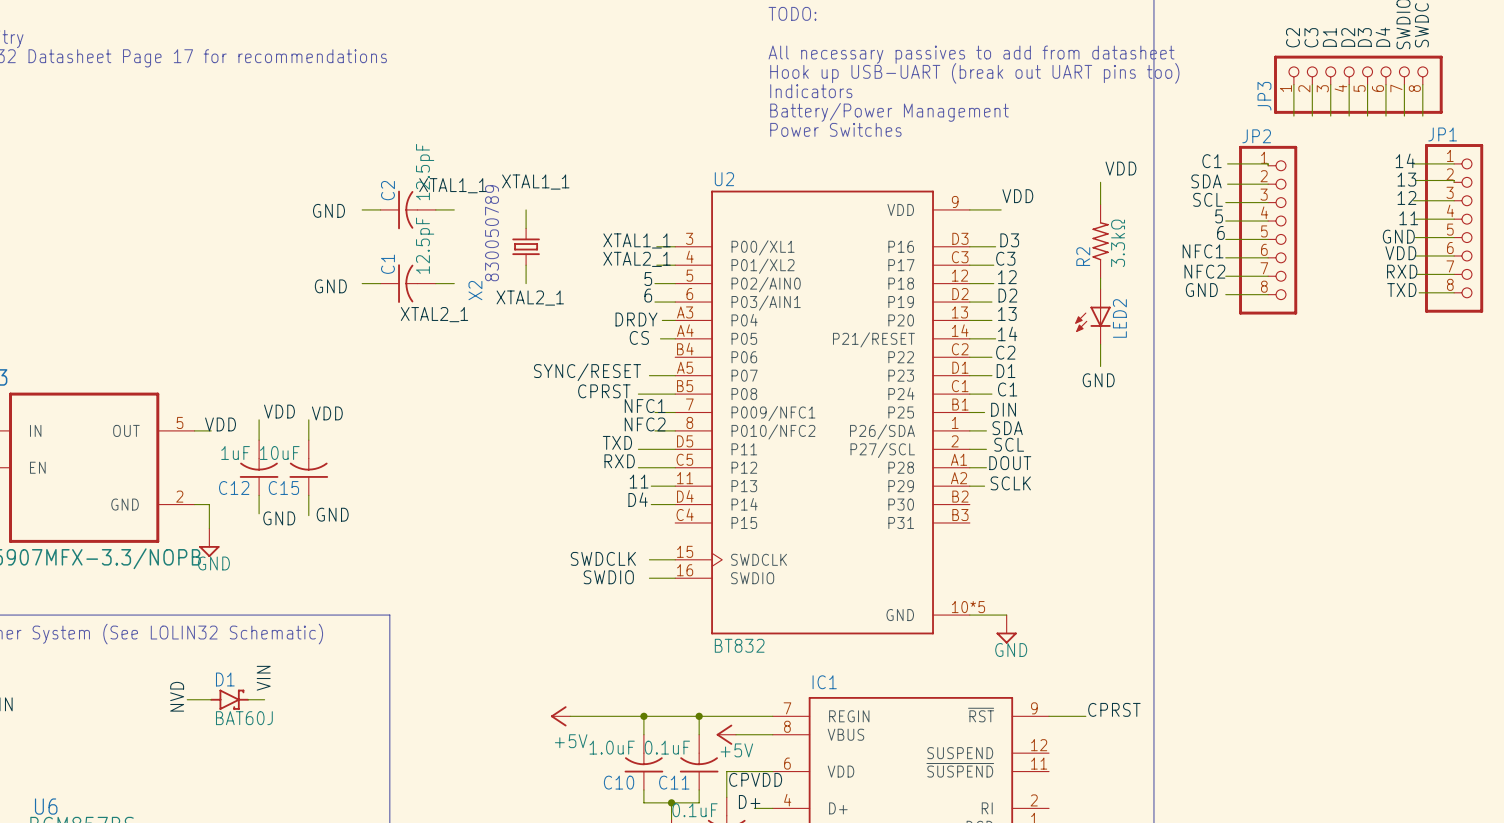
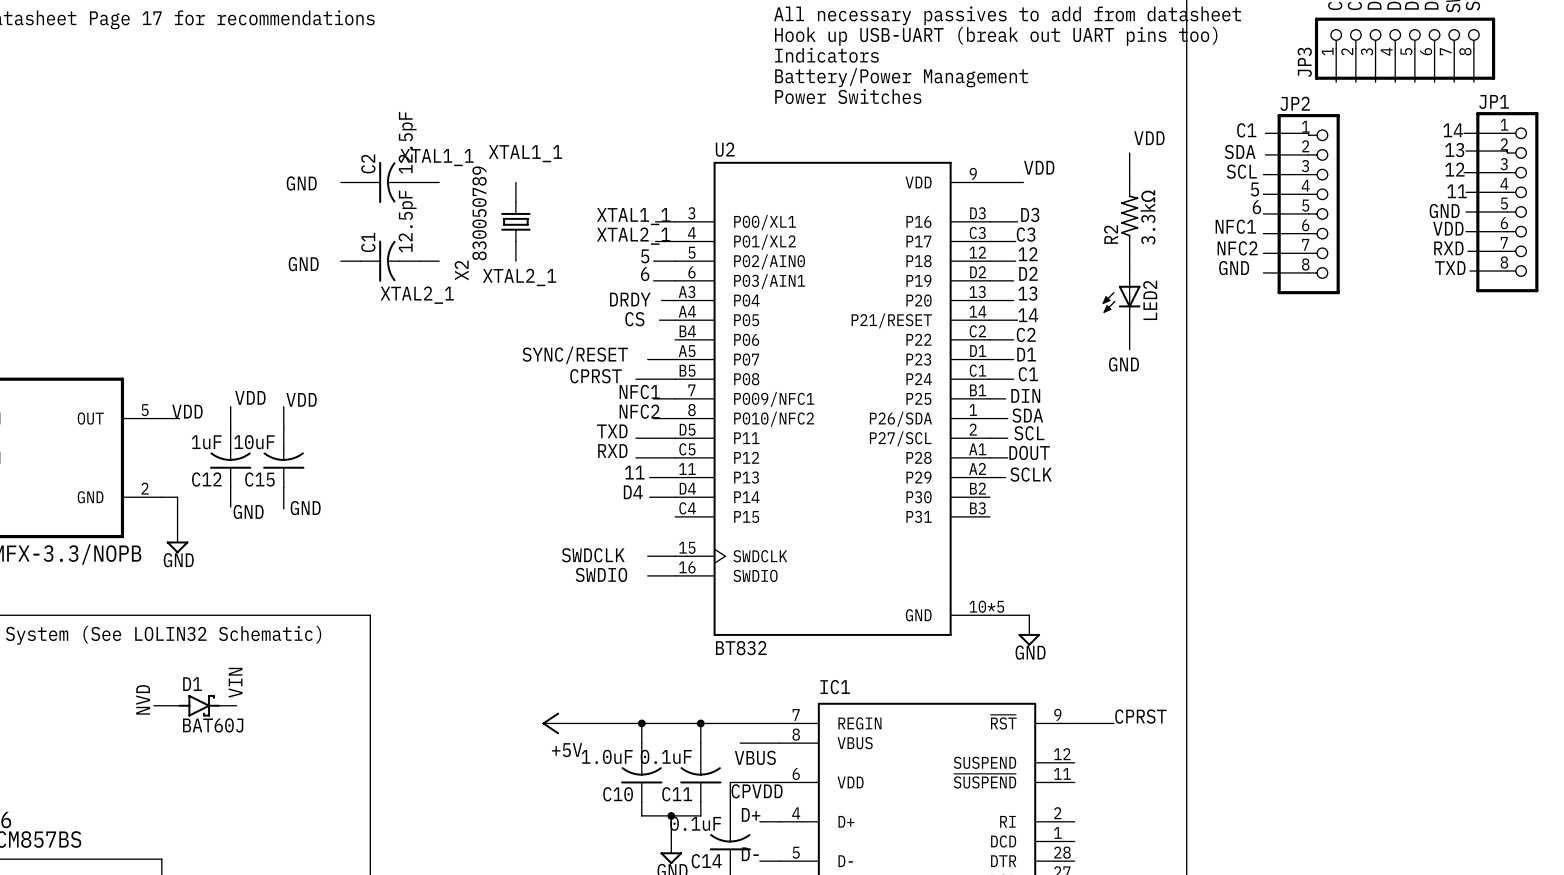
power symbol: +5V (726, 734) -> none
label: none -> VBUS (755, 757)

